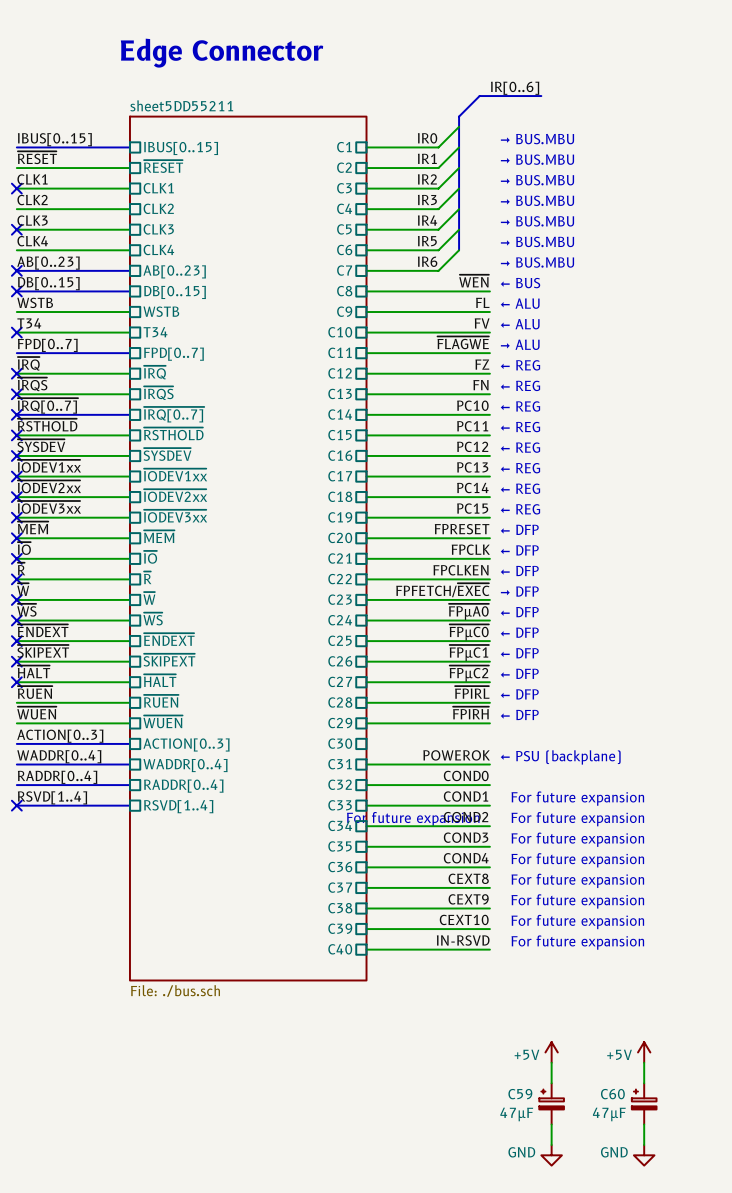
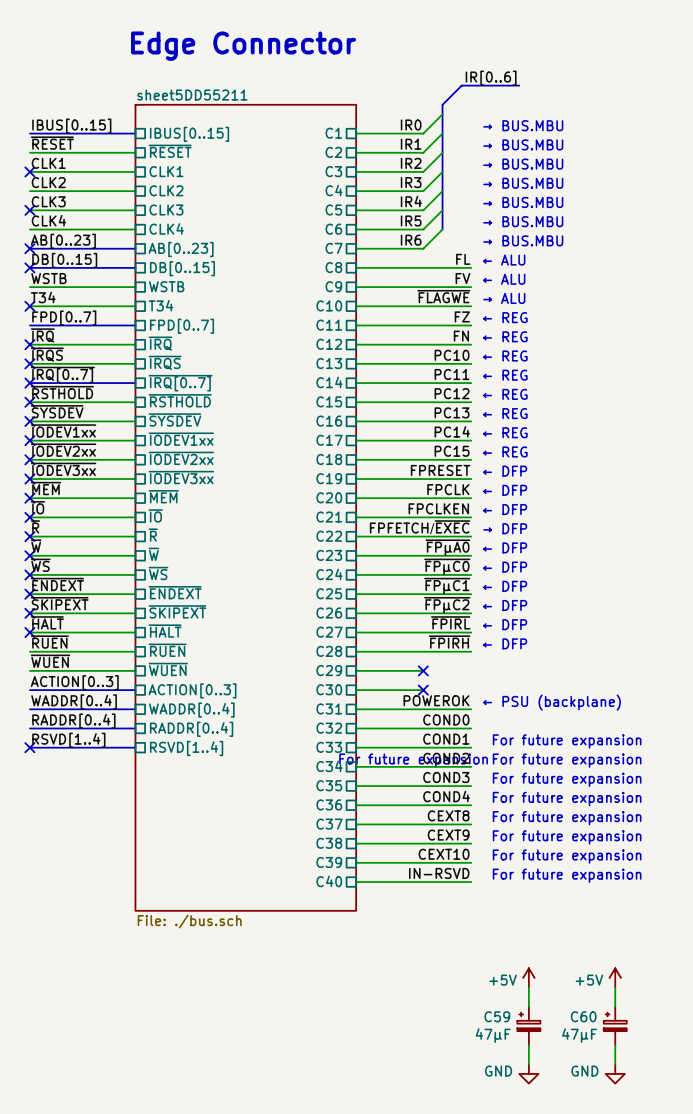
label: ~{WEN} (474, 281) -> FL (463, 259)
text: ← BUS (520, 283) -> ← ALU (504, 260)
label: FL (482, 302) -> FV (463, 278)
label: FV (482, 323) -> ~{FLAGWE} (443, 296)
text: ← ALU (520, 324) -> → ALU (504, 298)
label: ~{FLAGWE} (463, 342) -> FZ (462, 316)
text: → ALU (520, 344) -> ← REG (505, 317)
label: FZ (482, 364) -> FN (461, 336)
label: FN (480, 385) -> PC10 (452, 355)
label: PC10 (472, 405) -> PC11 (452, 374)
label: PC11 (472, 426) -> PC12 (452, 393)
label: PC12 (472, 446) -> PC13 (452, 412)
label: PC13 (472, 467) -> PC14 (452, 431)
label: PC14 (472, 488) -> PC15 (452, 451)
label: PC15 (472, 508) -> FPRESET (440, 470)
text: ← REG (520, 509) -> ← DFP (505, 471)
label: FPRESET (462, 529) -> FPCLK (448, 489)
label: FPCLK (470, 549) -> FPCLKEN (438, 508)
label: FPCLKEN (461, 570) -> FPFETCH∕~{EXEC} (420, 527)
text: ← DFP (519, 571) -> → DFP (505, 528)
label: FPFETCH∕~{EXEC} (442, 590) -> ~{FPµA0} (447, 547)
text: → DFP (519, 591) -> ← DFP (505, 547)
label: ~{FPµA0} (468, 611) -> ~{FPµC0} (447, 566)
label: ~{FPµC0} (469, 632) -> ~{FPµC1} (447, 586)
label: ~{FPµC1} (469, 653) -> ~{FPµC2} (447, 605)
label: ~{FPµC2} (469, 673) -> ~{FPIRL} (450, 622)
label: ~{FPIRL} (472, 692) -> ~{FPIRH} (449, 642)
label: ~{FPIRH} (470, 713) -> none
text: ← DFP (519, 714) -> none
wire: (438, 723) (489, 723) -> none
no-connect mark: none -> (423, 670)
wire: none -> (356, 690) (423, 690)
no-connect mark: none -> (423, 690)

